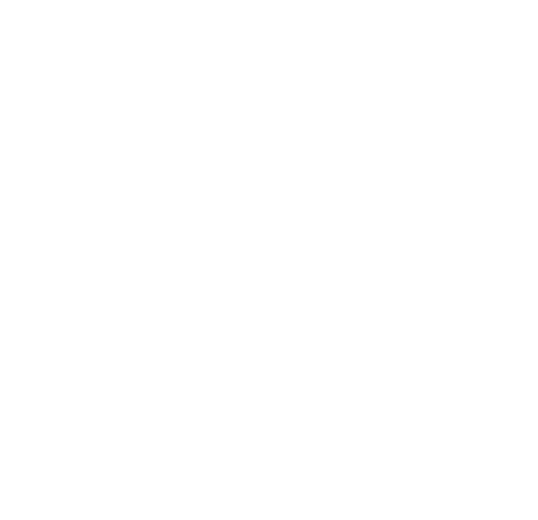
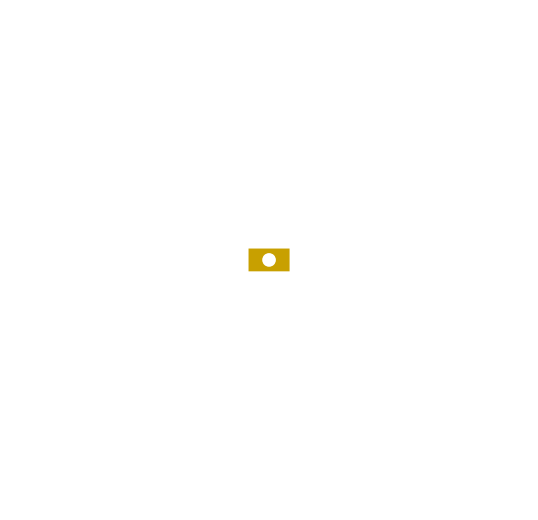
part: none -> (269, 259)

